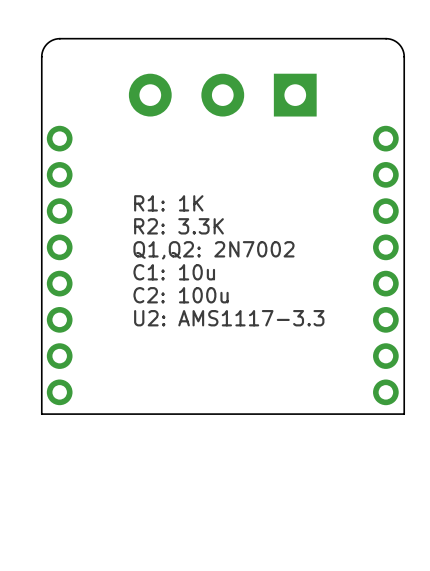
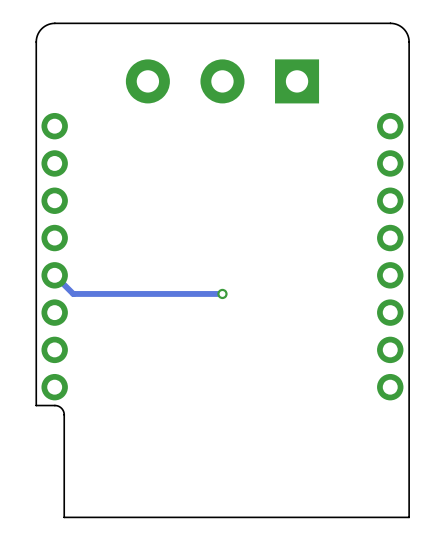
text: R1: 1K (168, 203) -> none
text: R2: 3.3K (178, 226) -> none
text: Q1,Q2: 2N7002 (213, 250) -> none
text: C1: 10u (174, 272) -> none
track: none -> (54, 275) (73, 293) (222, 293)
text: C2: 100u (181, 295) -> none
via: none -> (222, 293)
text: U2: AMS1117-3.3 (229, 318) -> none
board edge: (41, 410) (41, 414) (404, 414) -> (36, 405) (56, 405) (63, 412) (64, 517) (409, 517) (409, 409)

